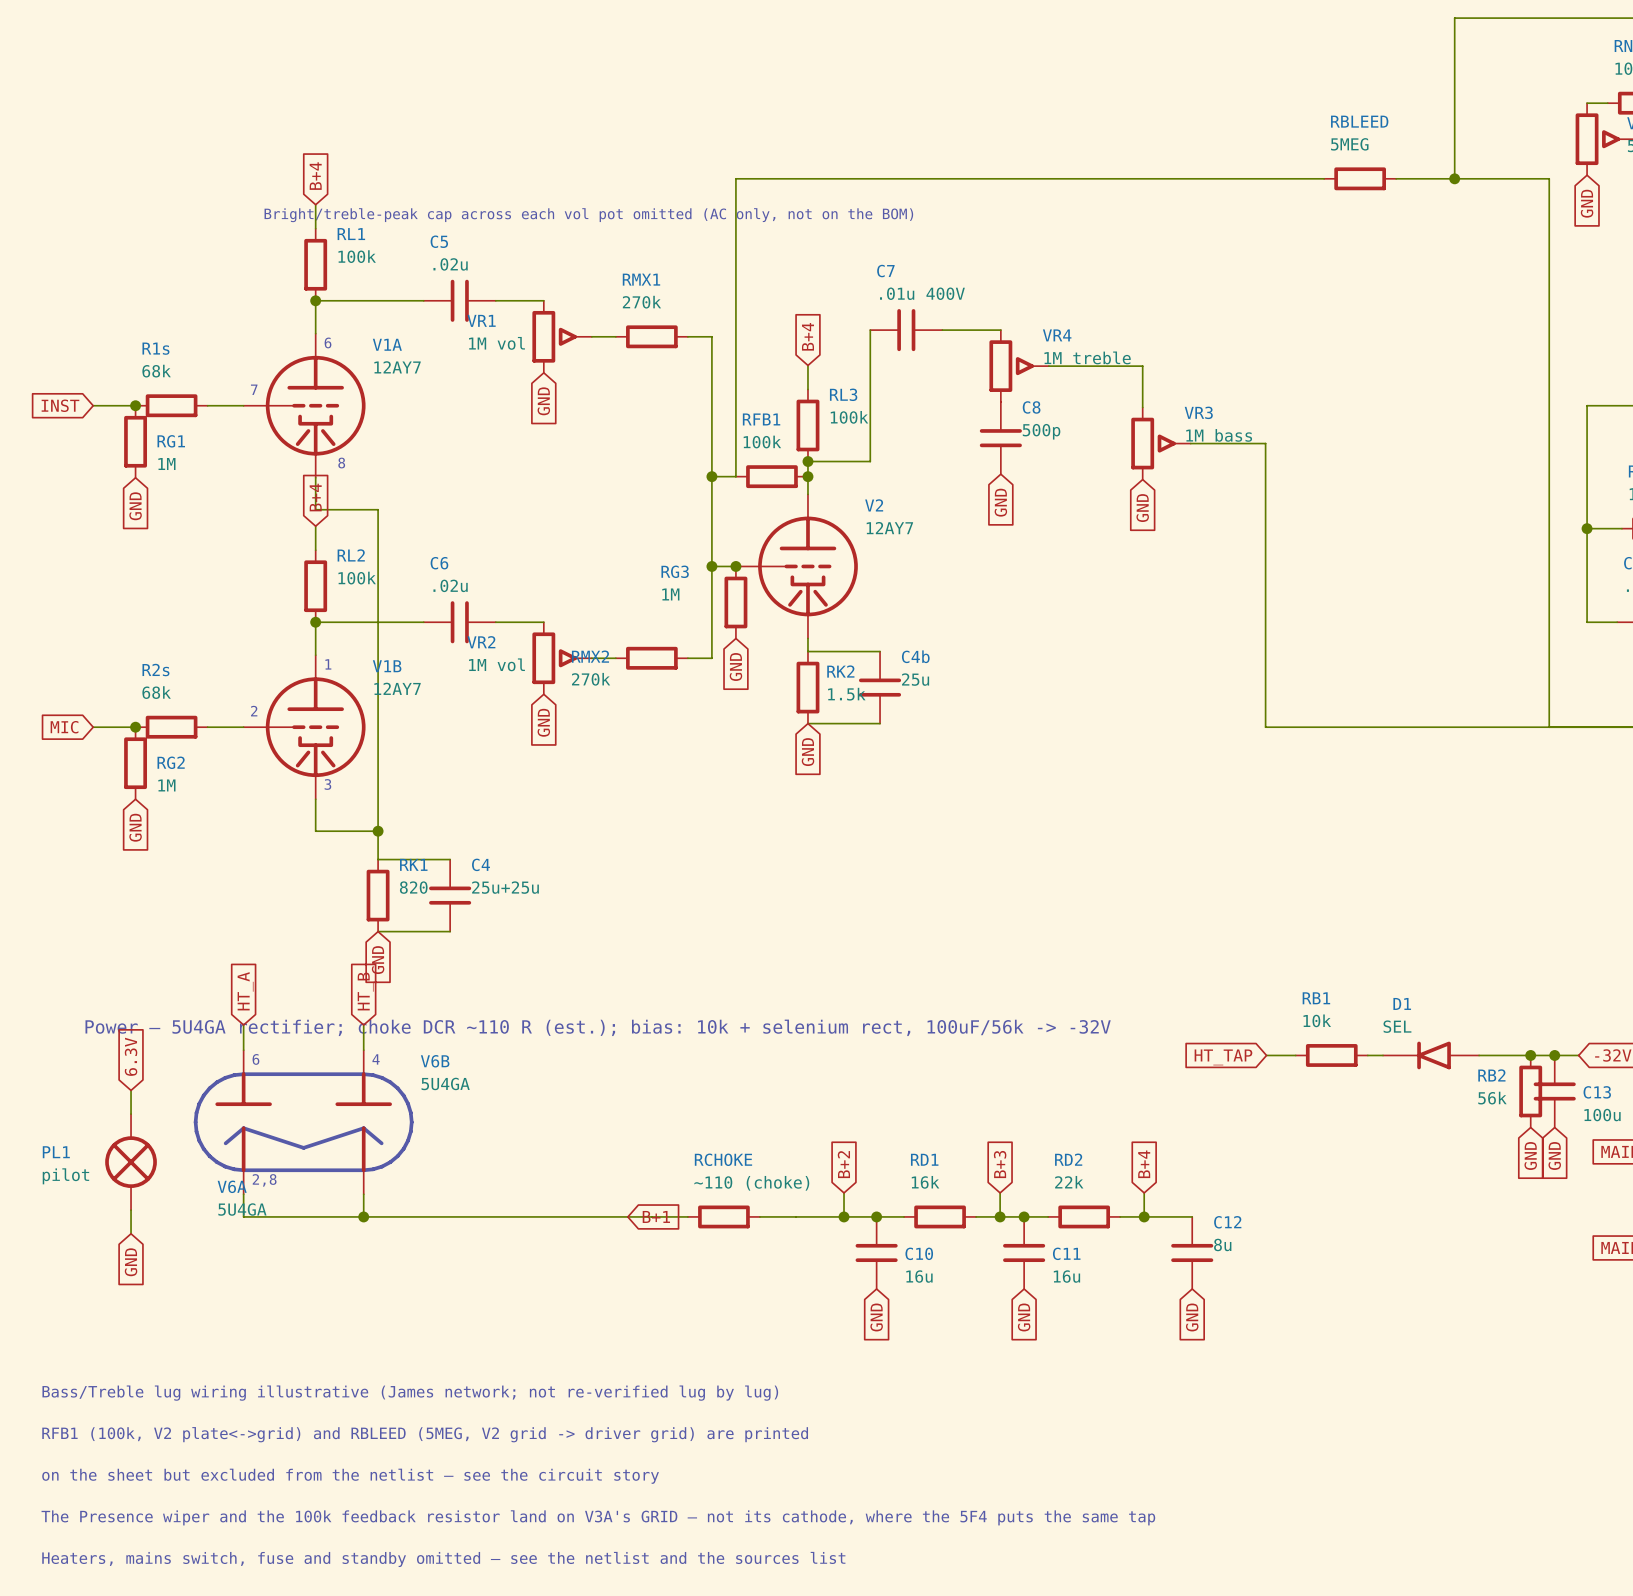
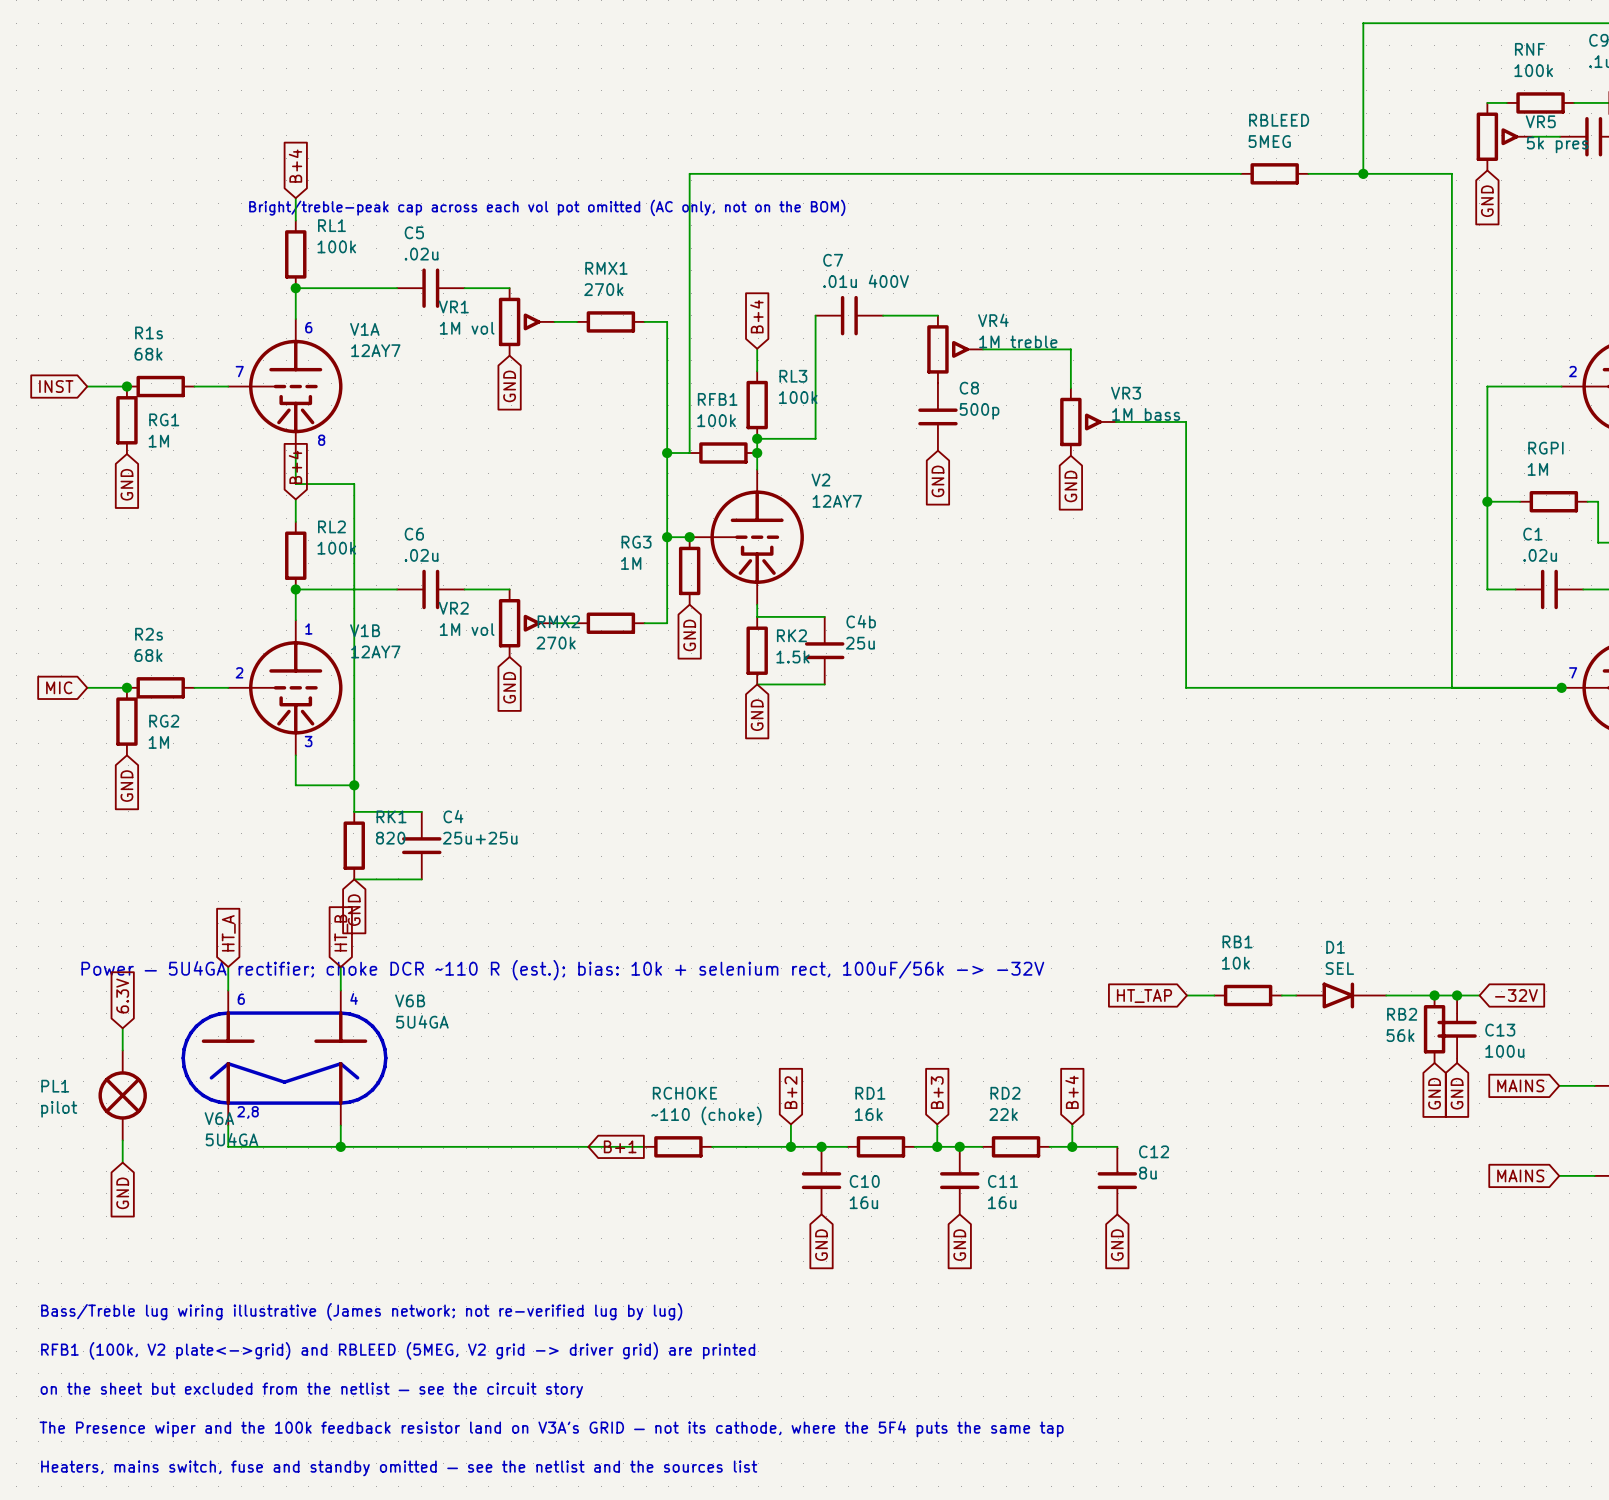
D1 name position: D1 (1402, 1003) -> D1 (1335, 947)
D1 value position: SEL (1397, 1026) -> SEL (1339, 968)
D1 rotation: 0° (1434, 1055) -> 180° (1338, 995)

